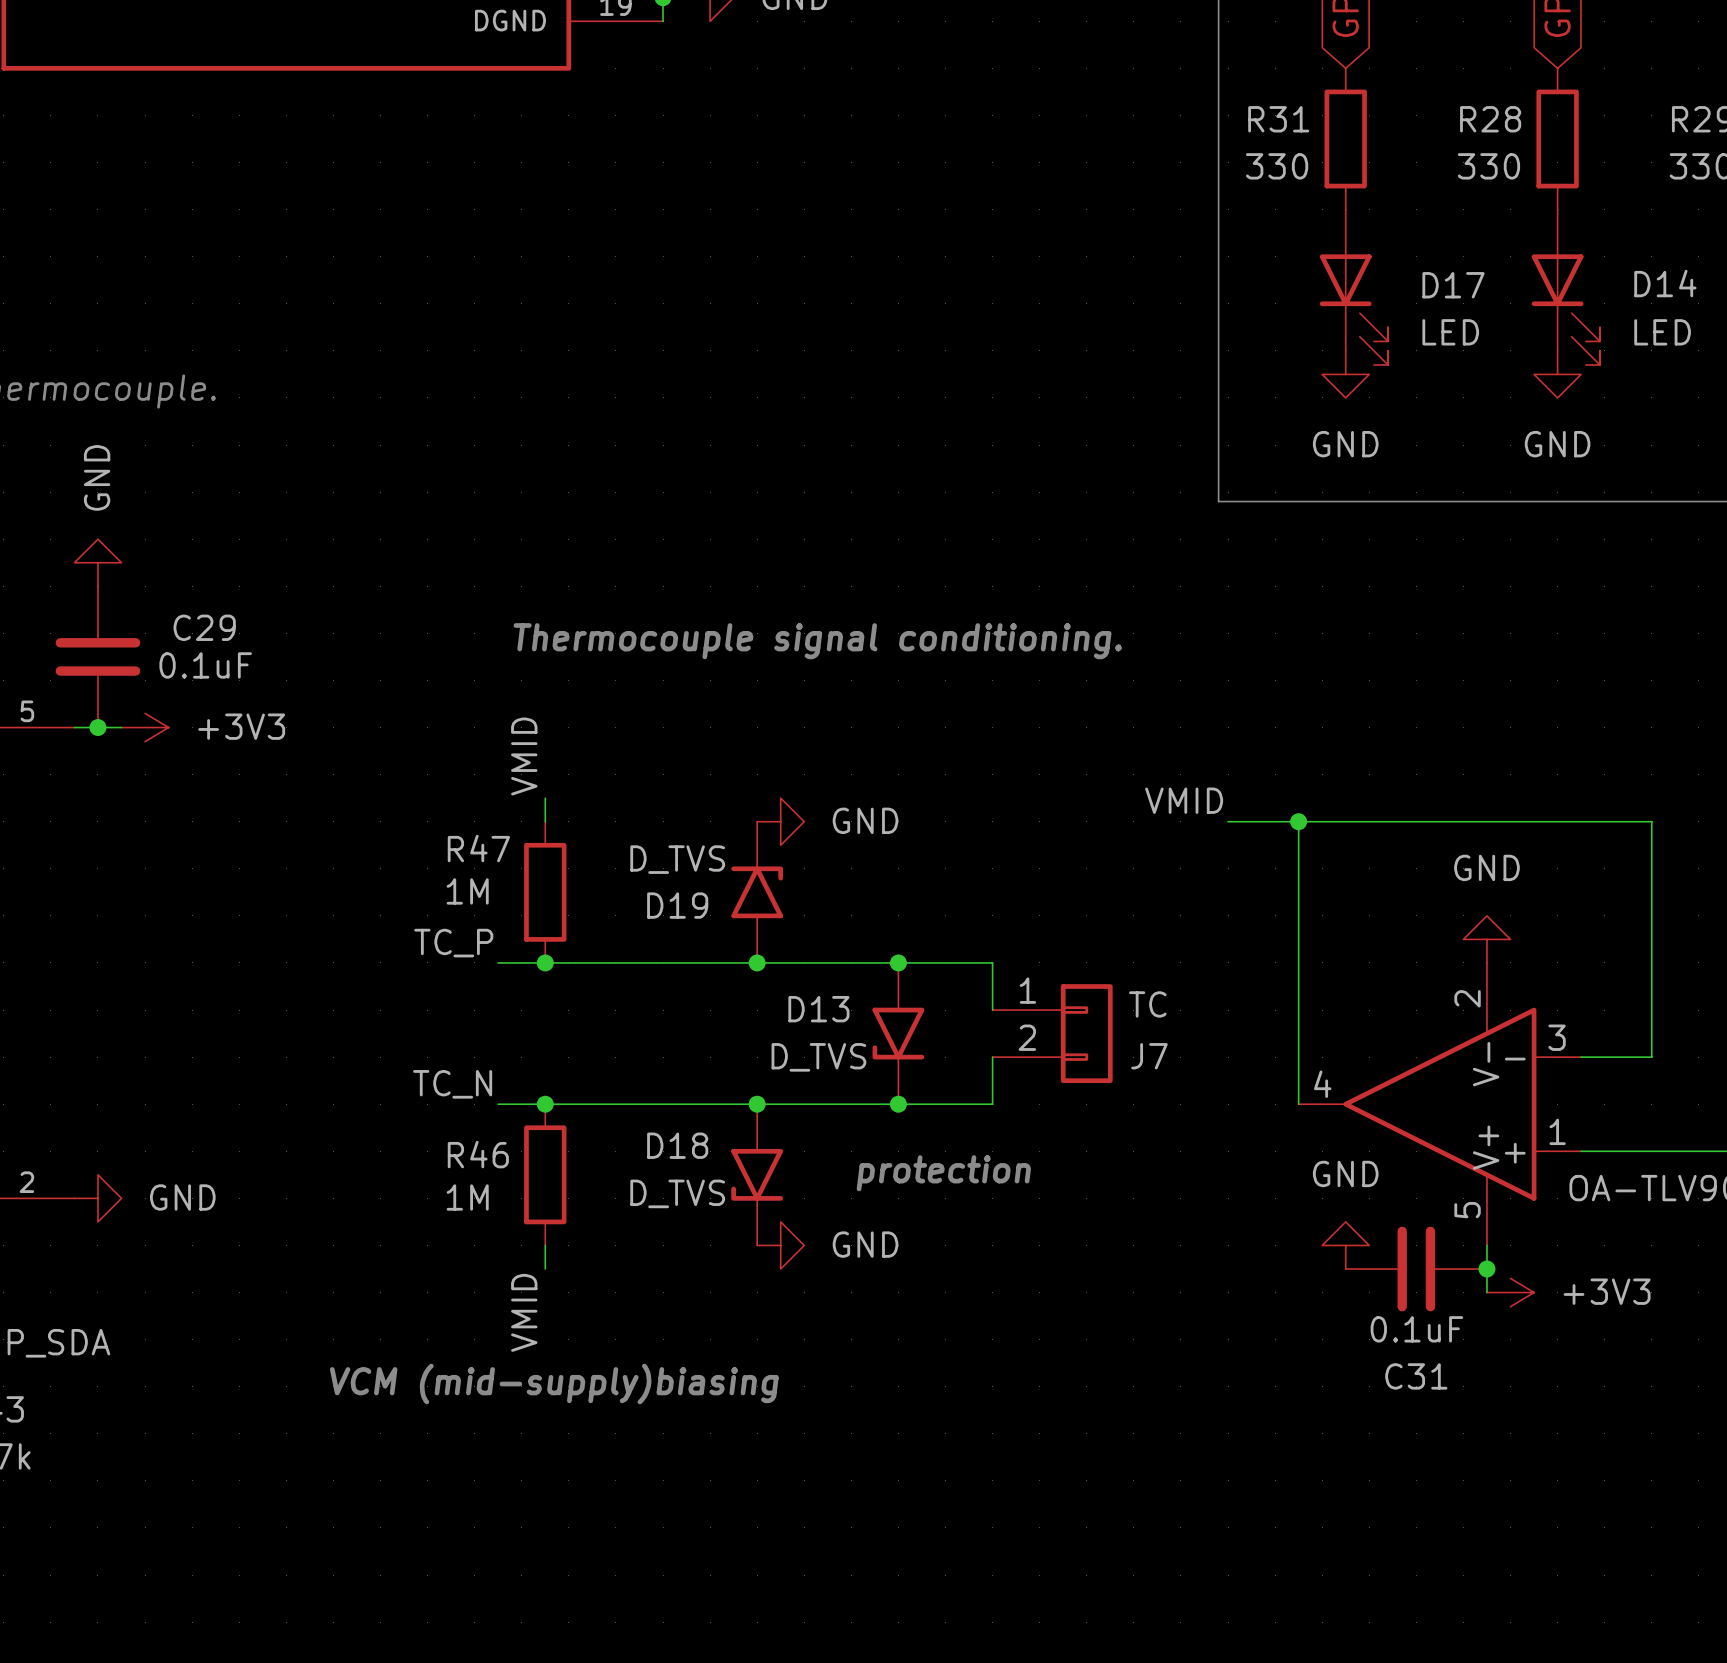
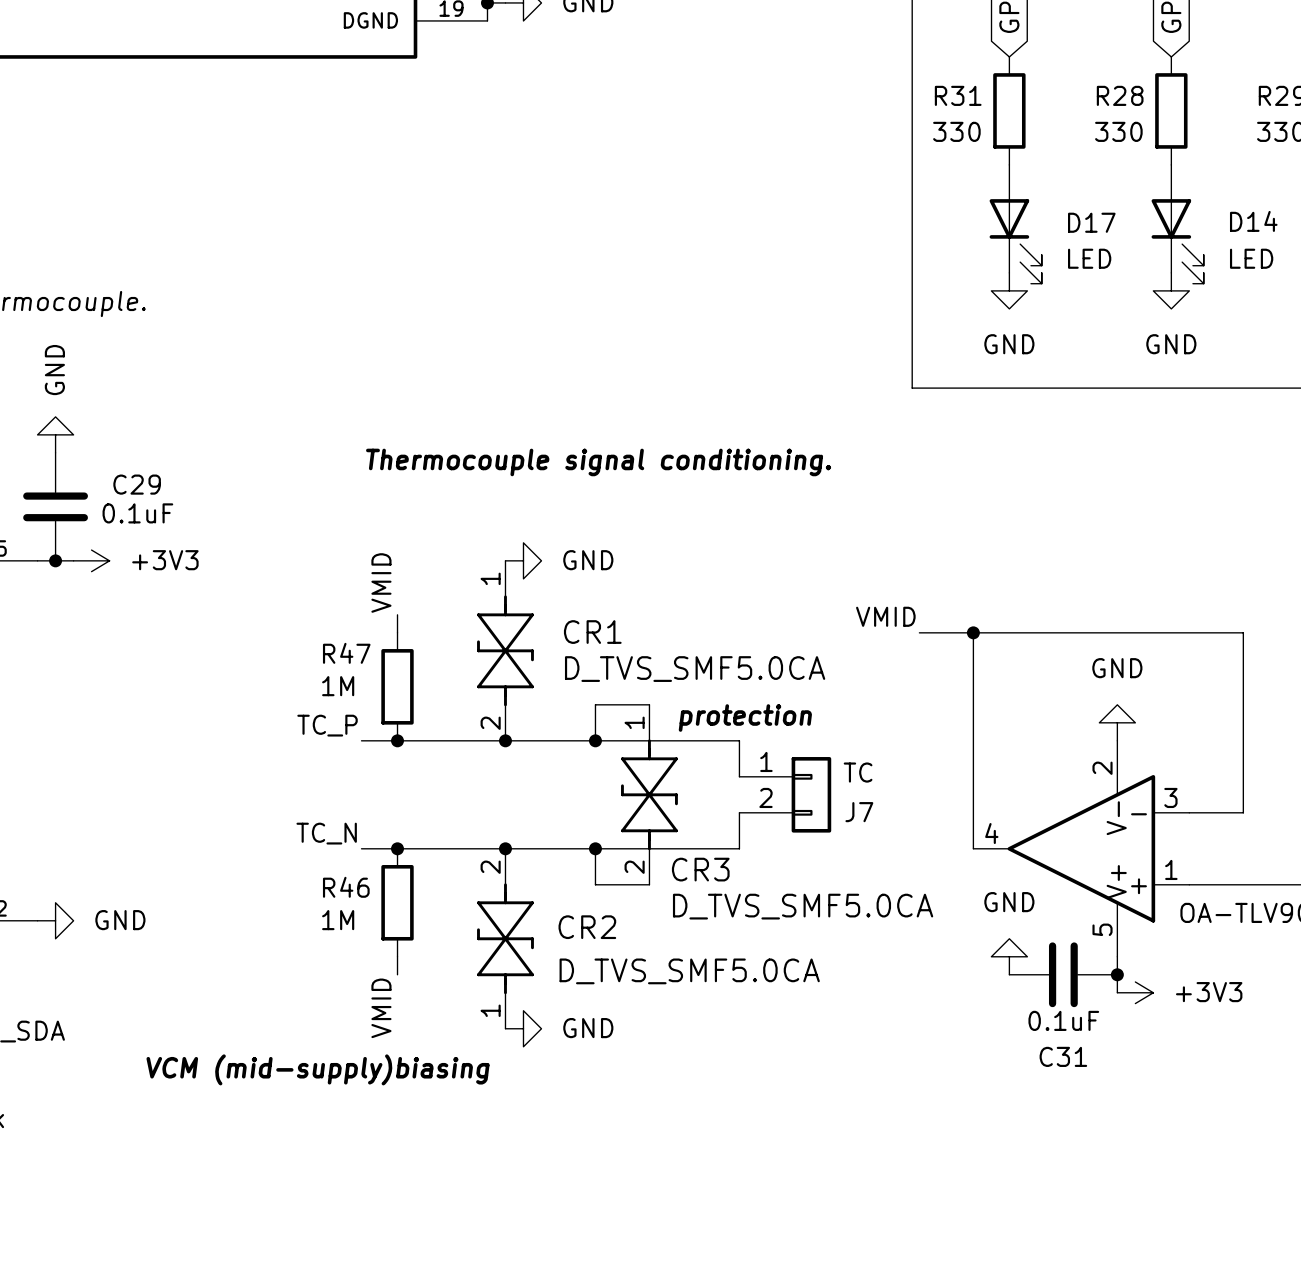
text position: Thermocouple signal conditioning. (817, 641) -> Thermocouple signal conditioning. (598, 462)
power symbol position: GND (780, 821) -> GND (523, 560)
CR1: none -> D_TVS_SMF5.0CA (505, 650)
D19: D_TVS (757, 892) -> none
wire: none -> (649, 704) (595, 704) (595, 740)
junction: none -> (505, 740)
junction: (757, 962) -> none
junction: none -> (595, 740)
junction: (898, 962) -> none
CR3: none -> D_TVS_SMF5.0CA (649, 794)
D13: D_TVS (898, 1033) -> none
junction: none -> (505, 848)
junction: (757, 1104) -> none
wire: none -> (595, 848) (595, 884) (649, 884)
junction: none -> (595, 848)
junction: (898, 1104) -> none
text position: protection (943, 1173) -> protection (745, 718)
D18: D_TVS (757, 1174) -> none
CR2: none -> D_TVS_SMF5.0CA (505, 938)
power symbol position: GND (780, 1245) -> GND (523, 1028)
text position: VCM (mid-supply)biasing (554, 1384) -> VCM (mid-supply)biasing (318, 1069)

